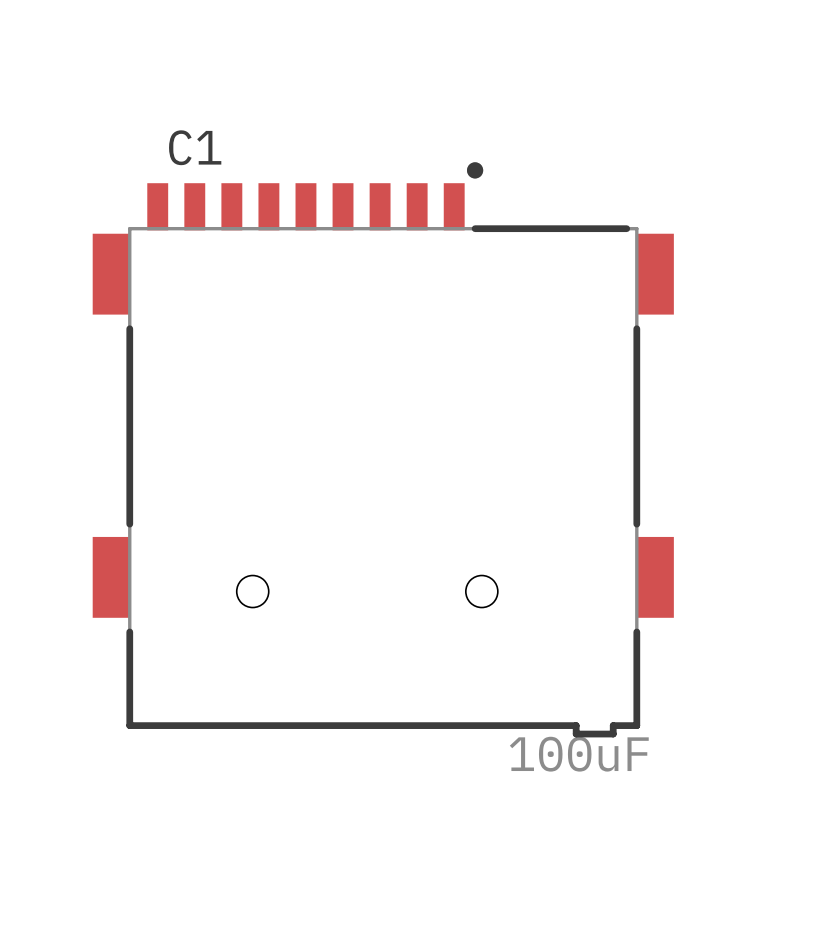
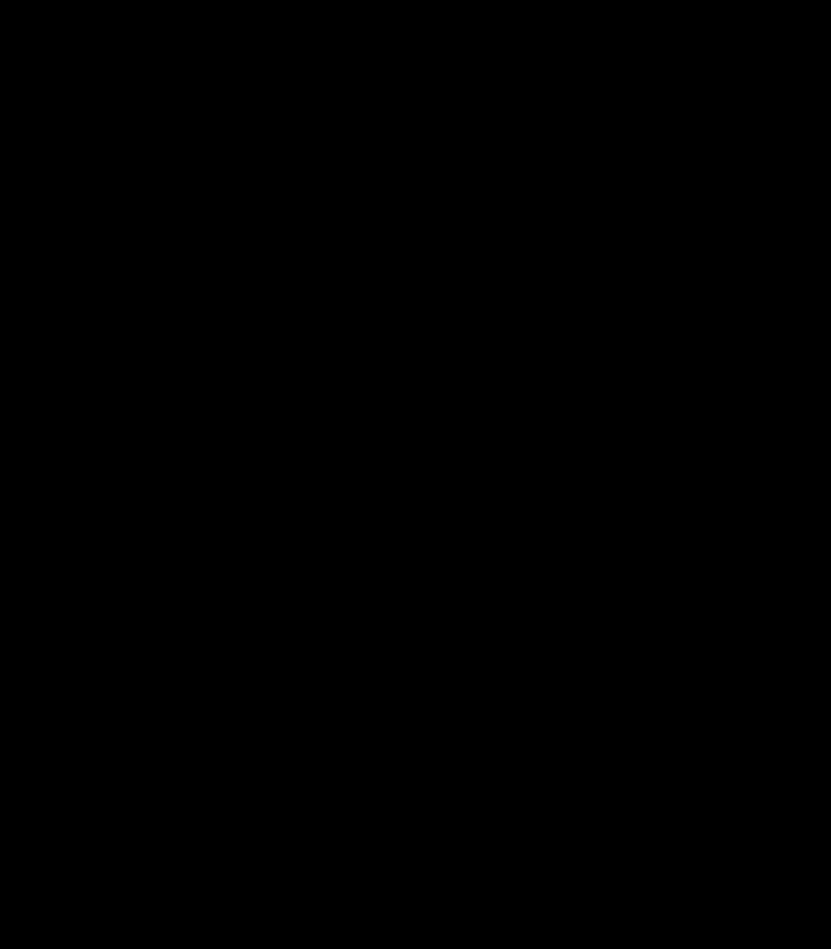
C1: 100uF (383, 449) -> none

